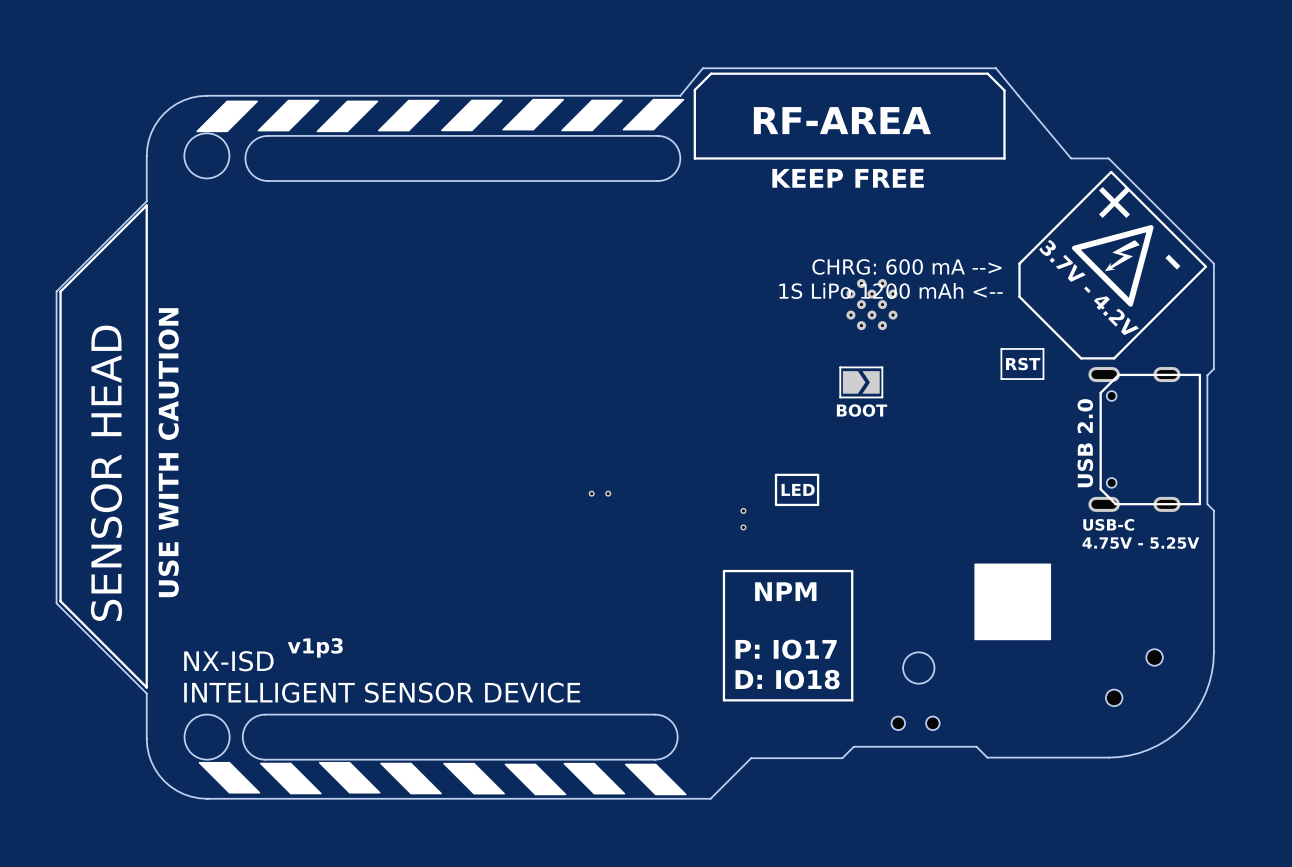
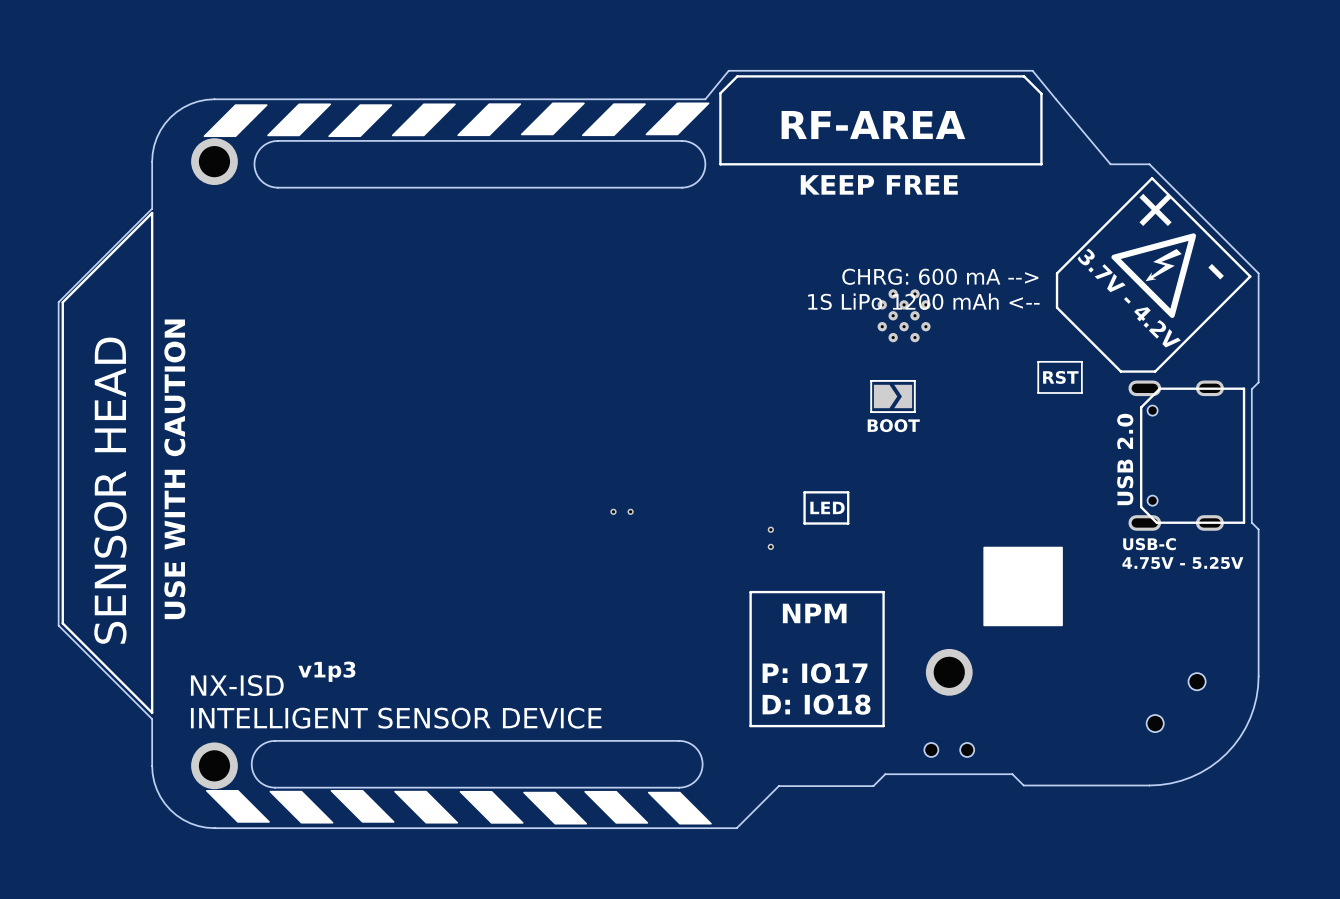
round board edge: [183, 132, 230, 179] -> none
part: none -> (214, 161)
drawing position: (1012, 601) -> (1023, 586)
part: none -> (949, 672)
round board edge: [902, 651, 936, 685] -> none
round board edge: [184, 714, 231, 761] -> none
part: none -> (214, 765)

